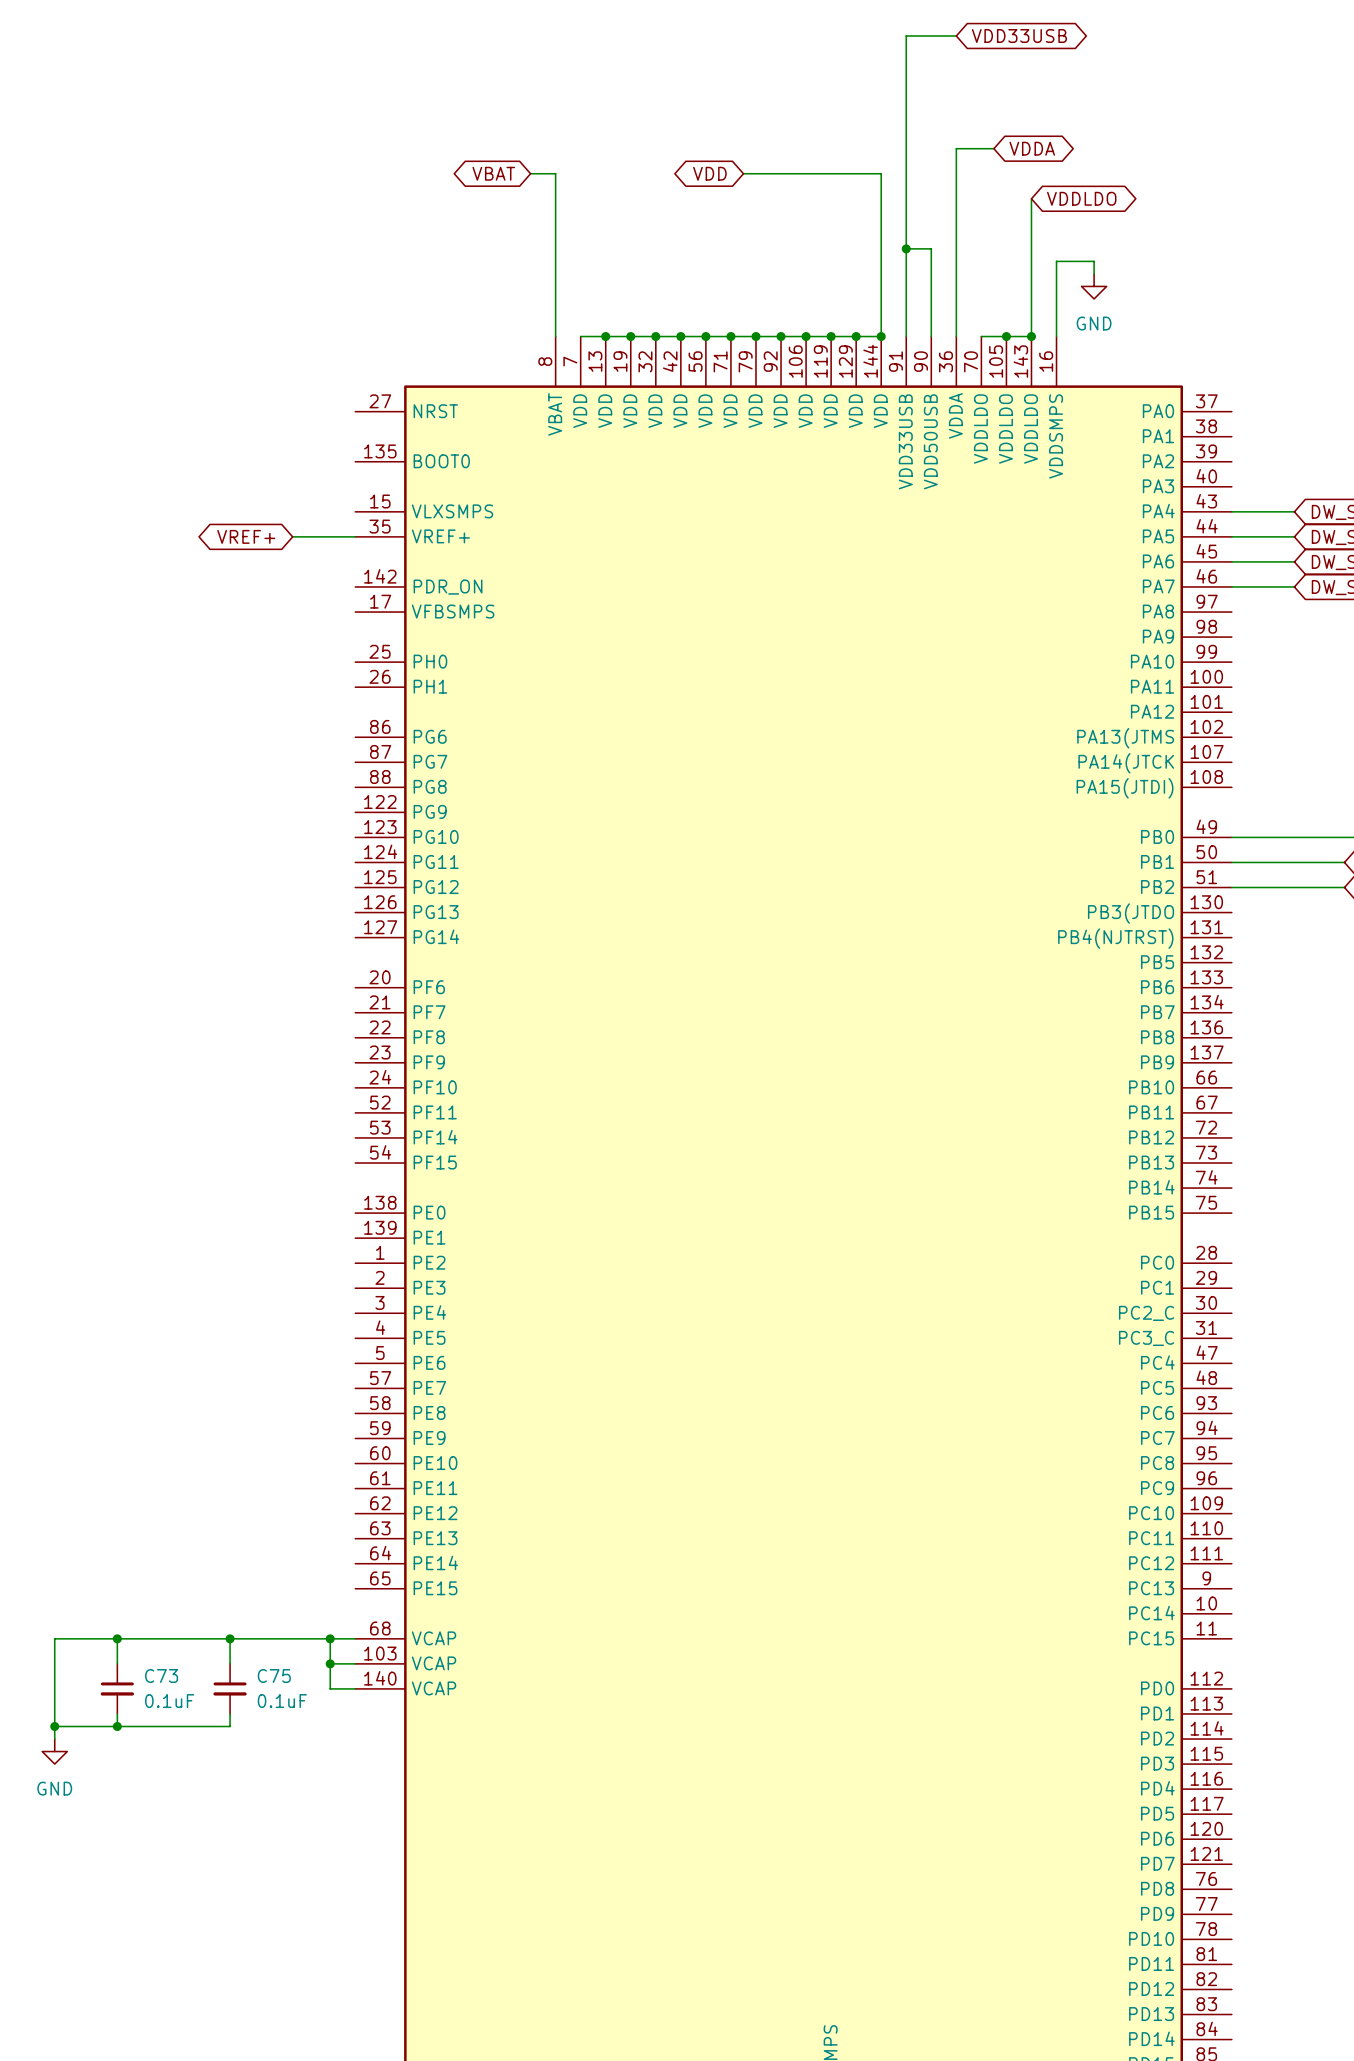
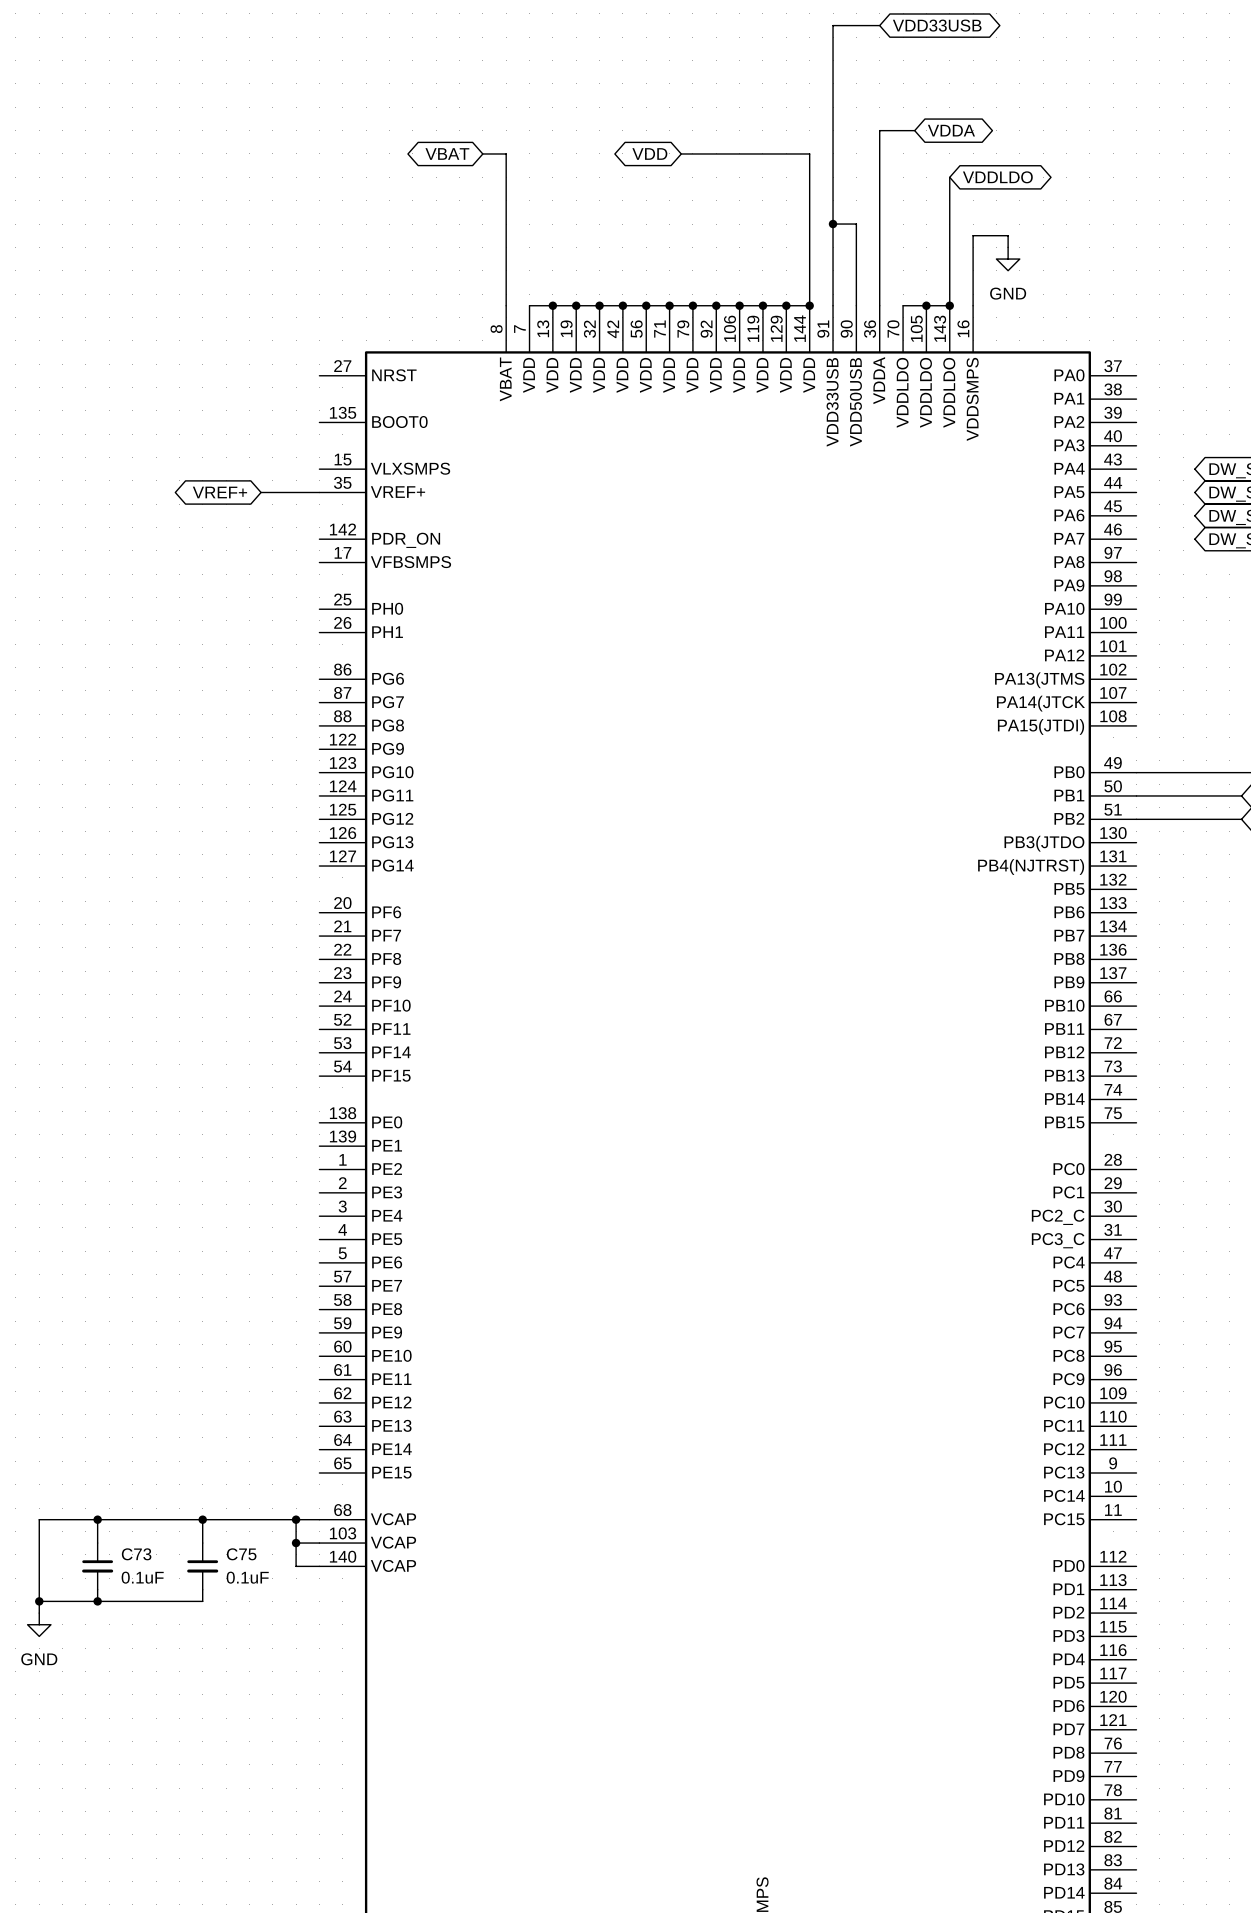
wire: (1231, 511) (1294, 511) -> none
wire: (1231, 536) (1294, 536) -> none
wire: (1231, 561) (1294, 561) -> none
wire: (1231, 586) (1294, 586) -> none

